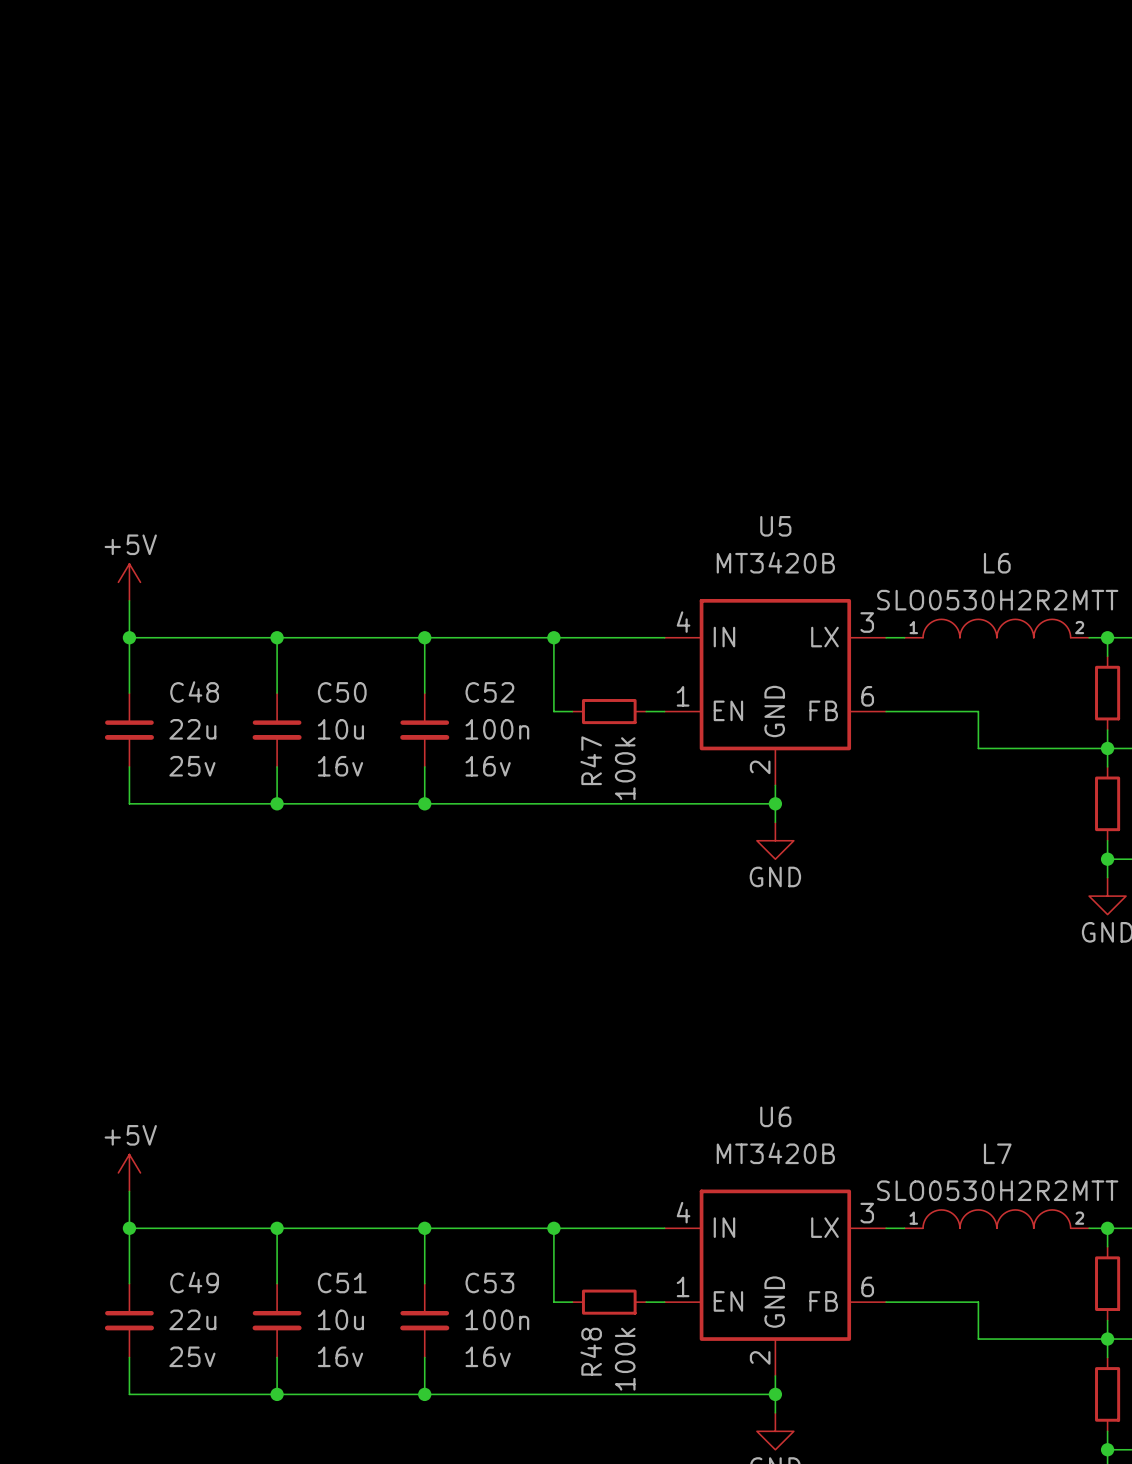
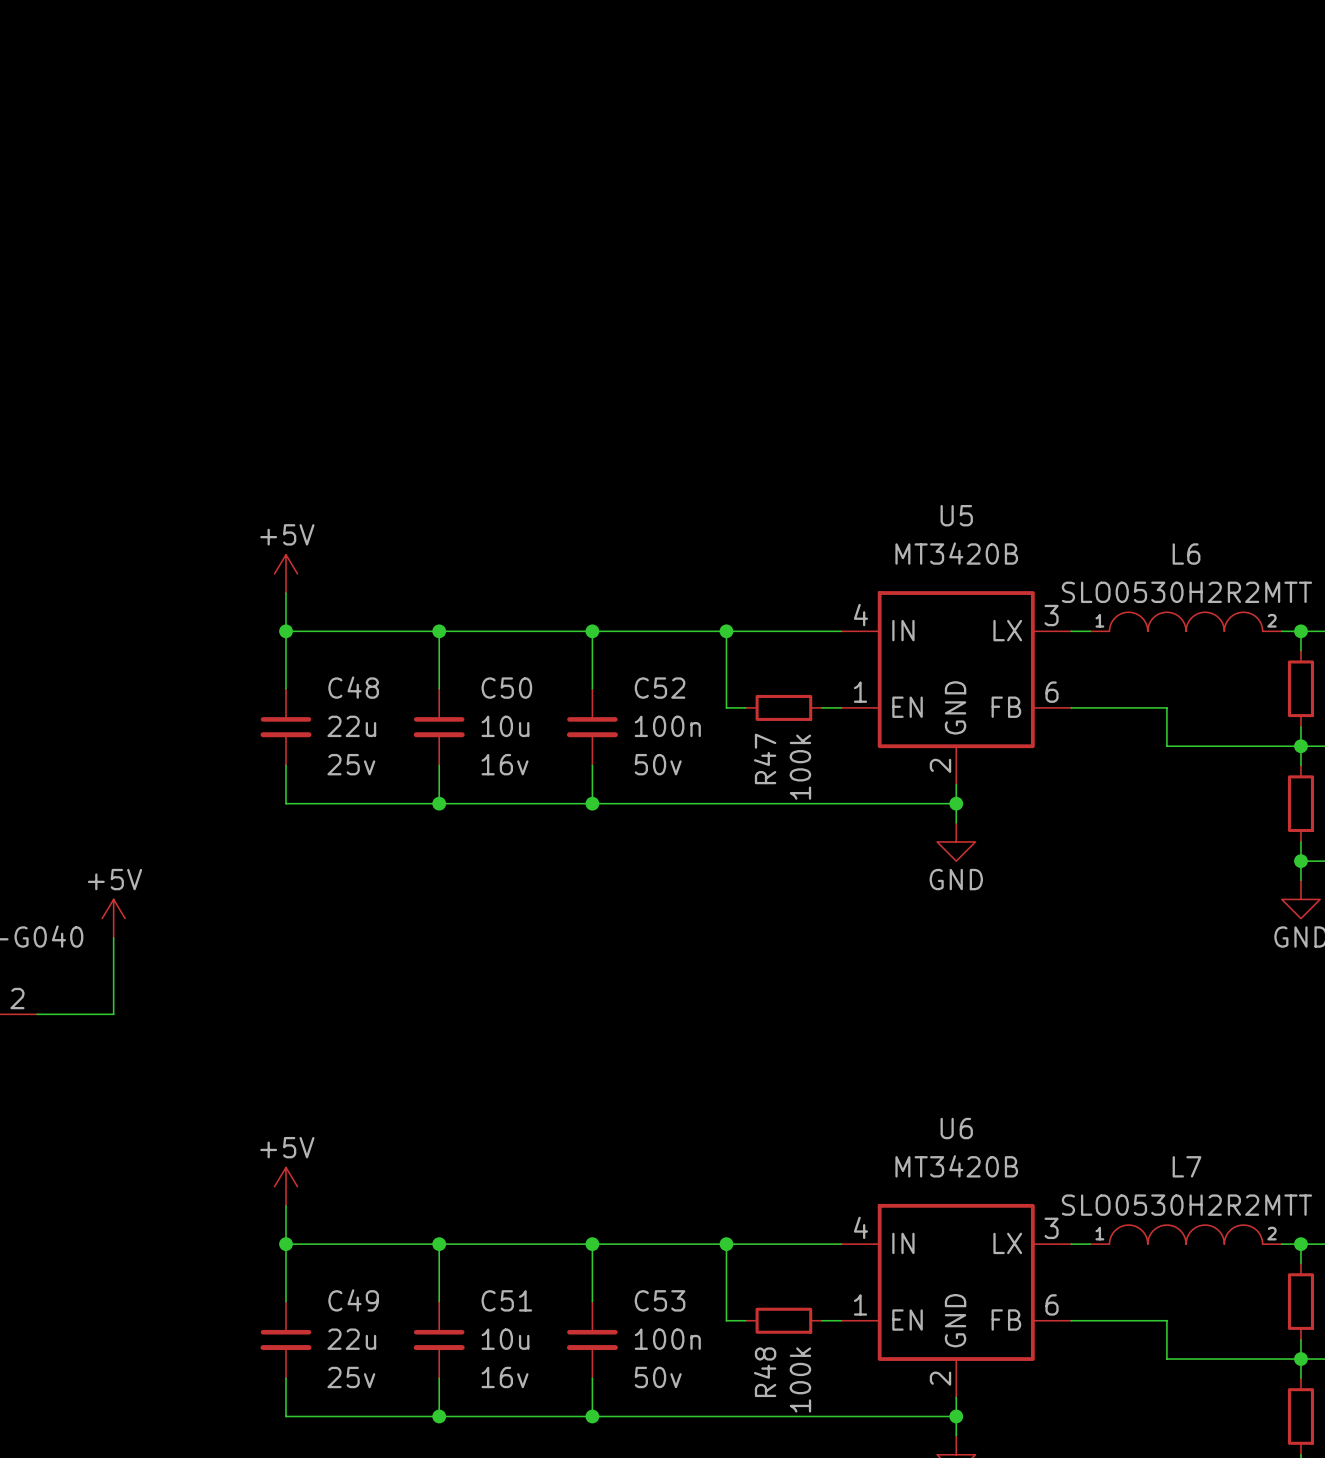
C52 text: 16v (488, 766) -> 50v (658, 764)
C53 text: 16v (488, 1356) -> 50v (658, 1377)

